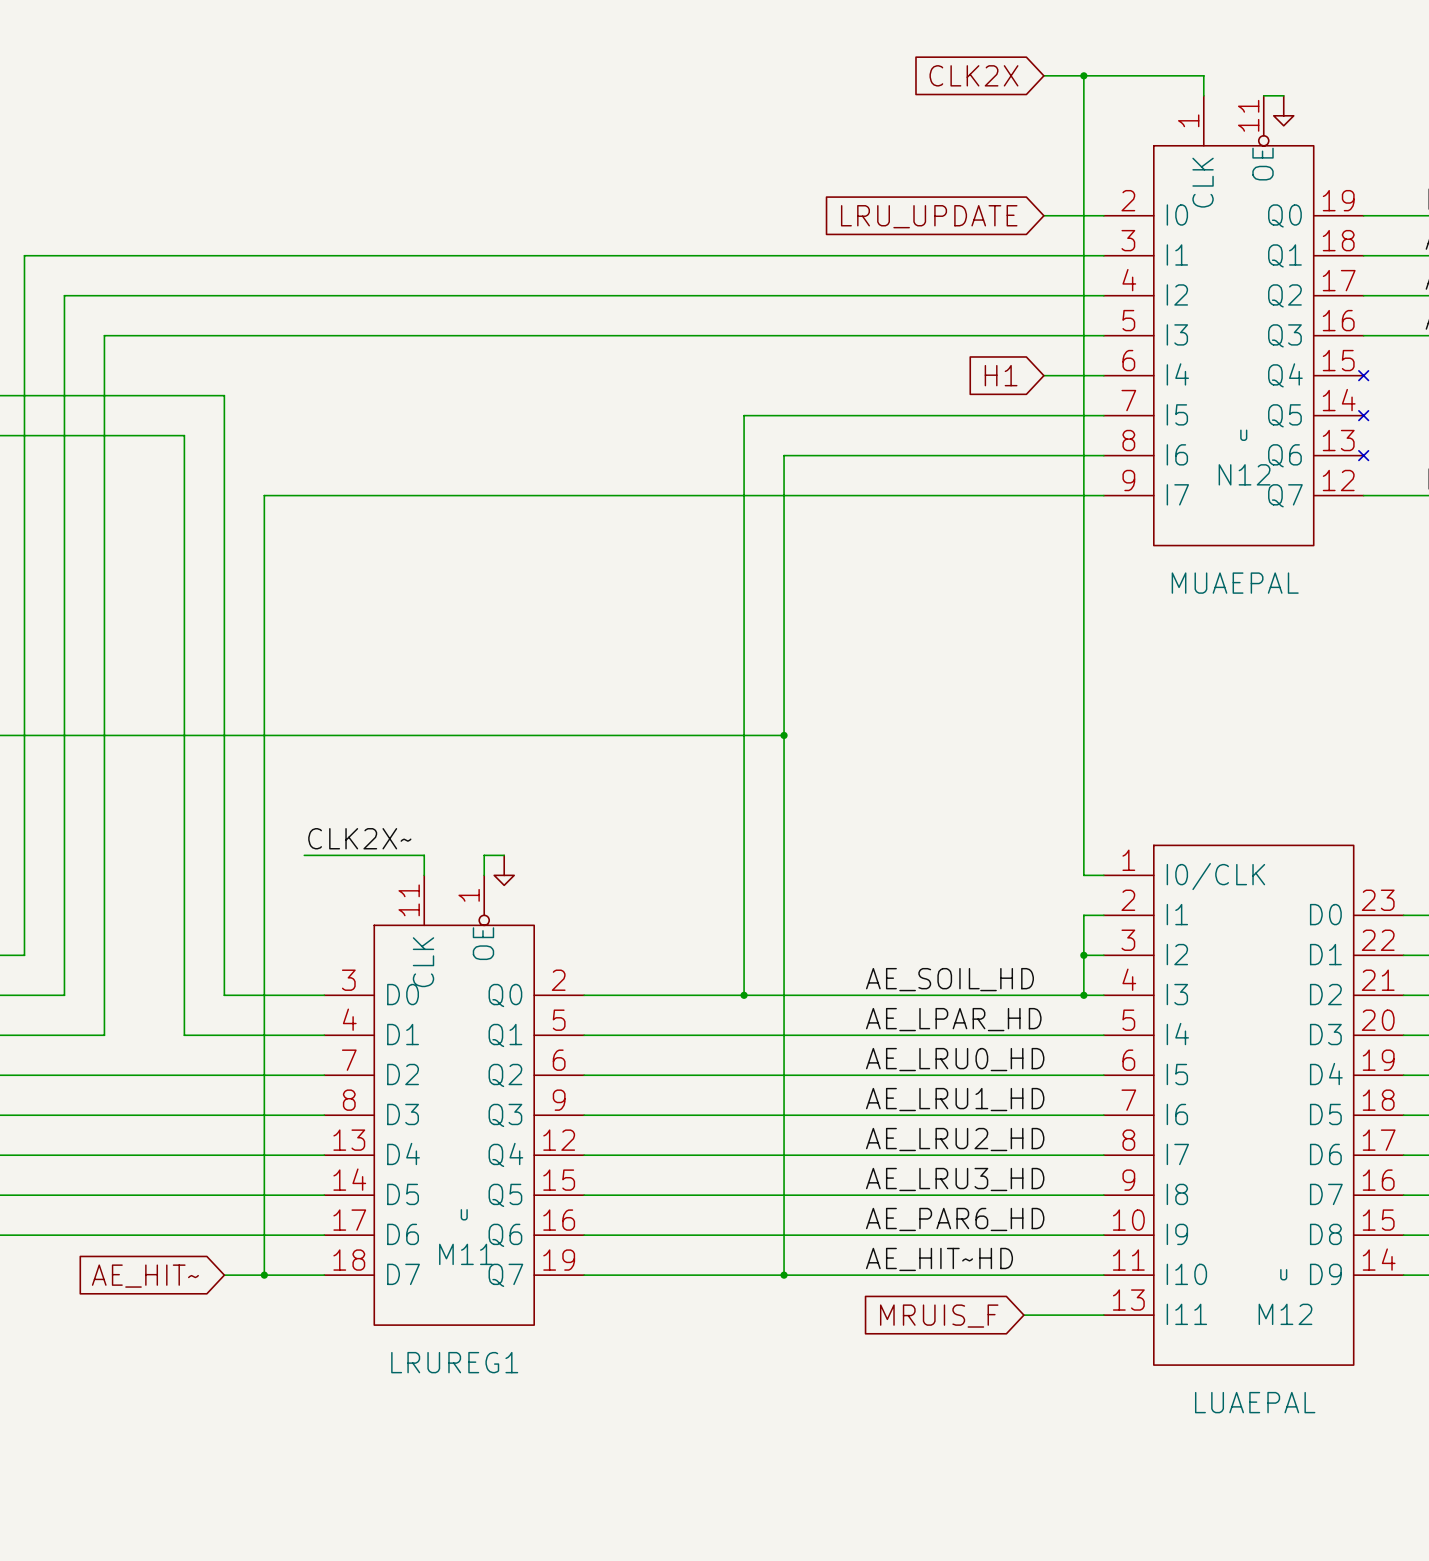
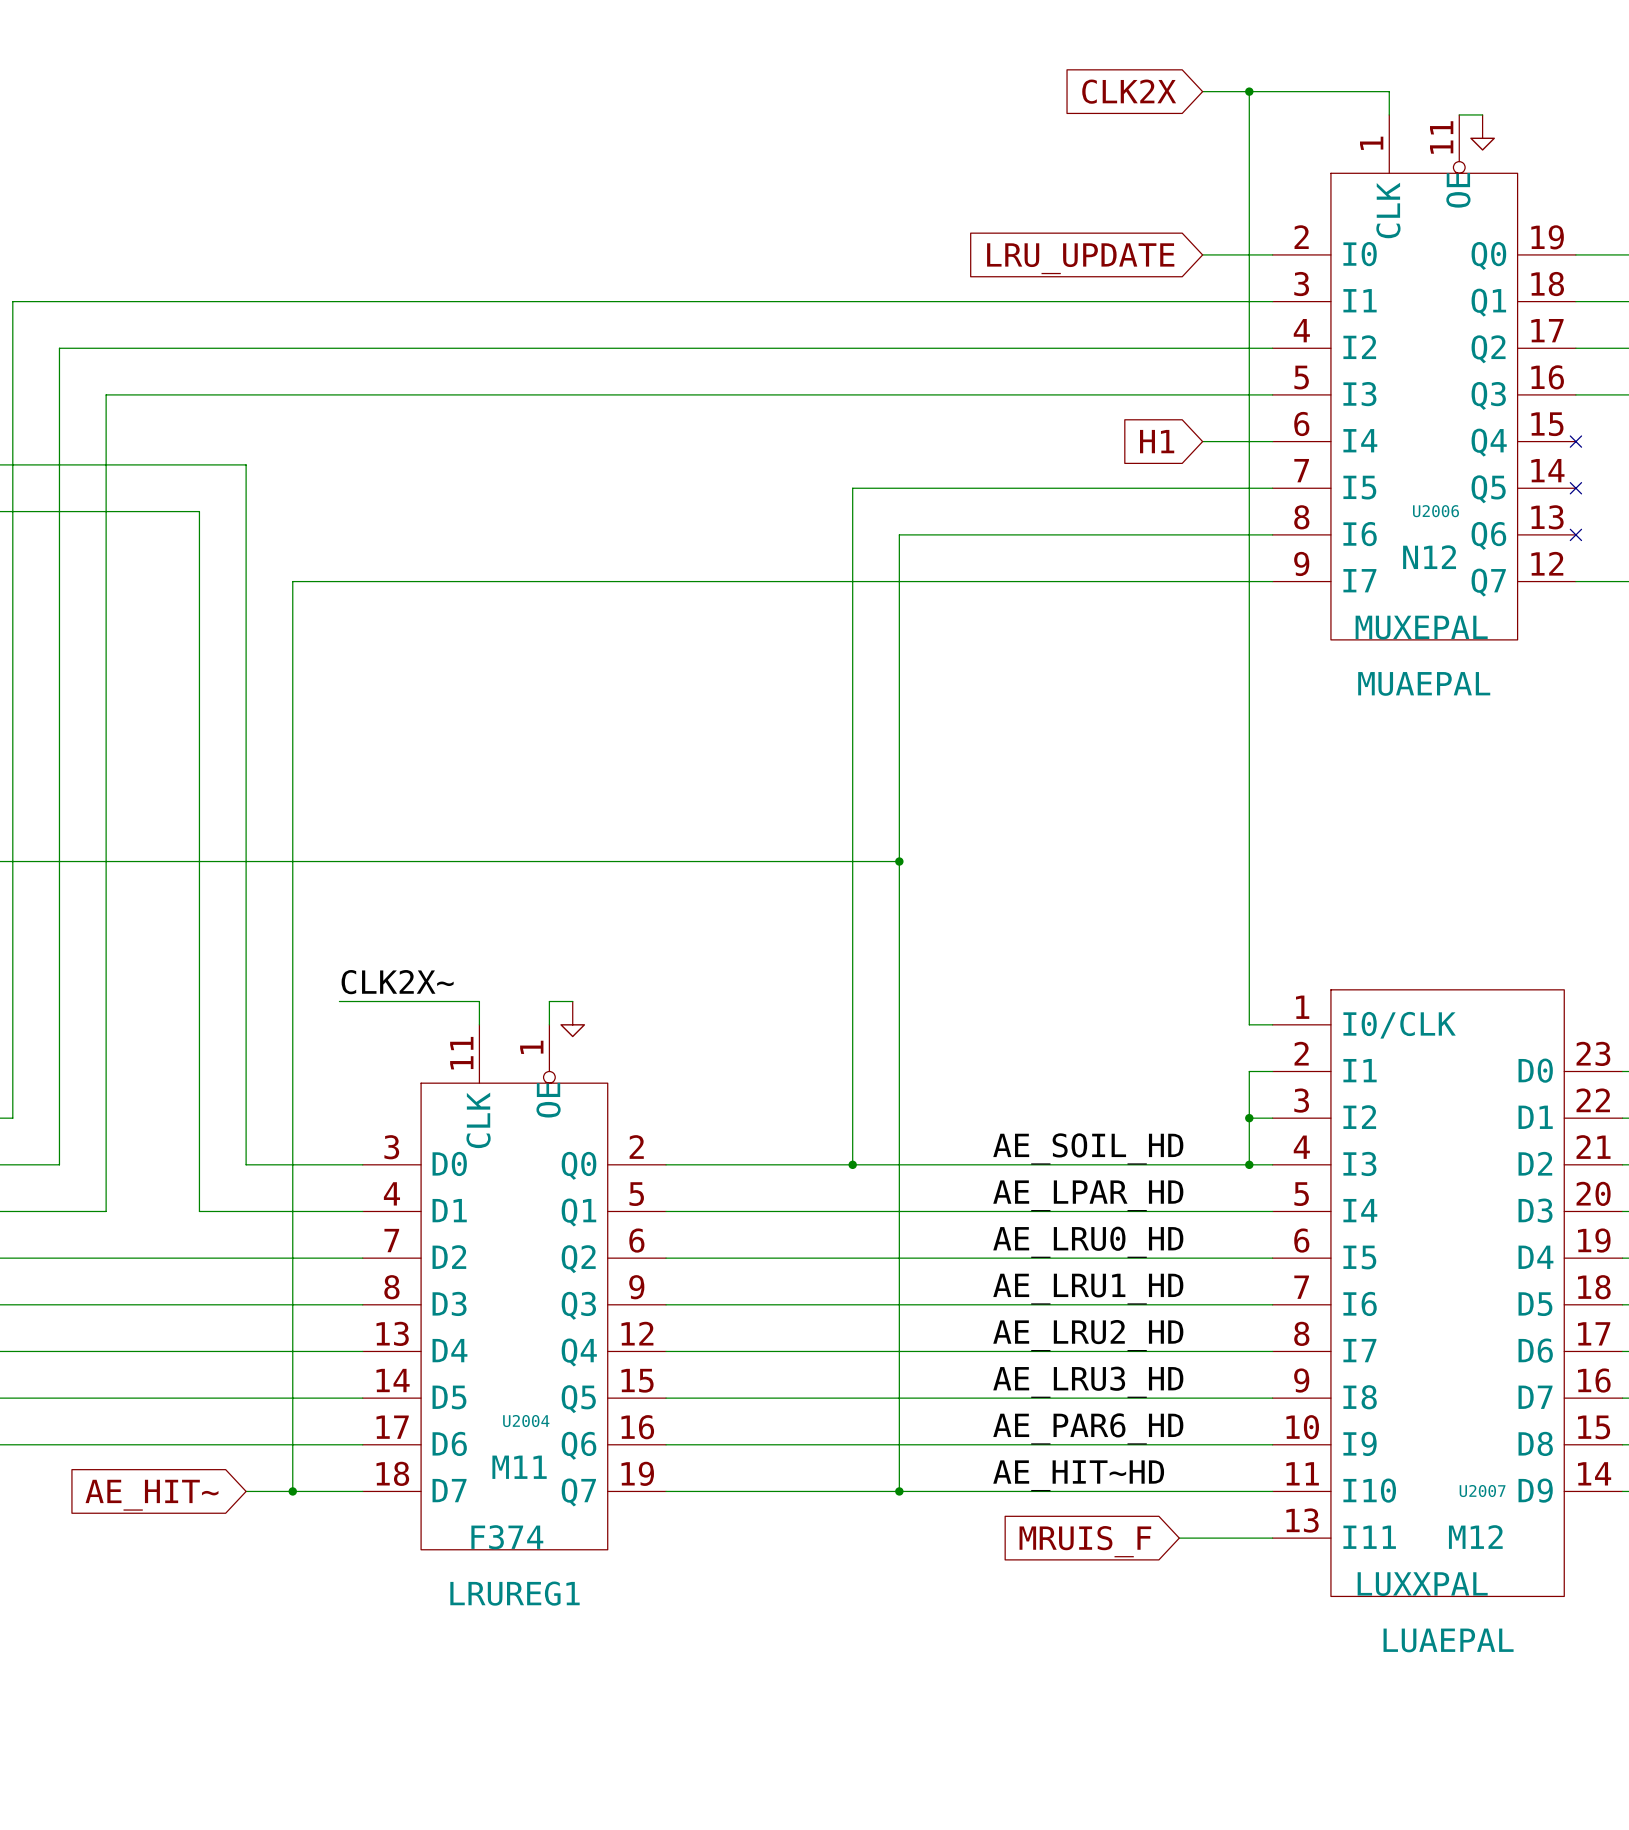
U name: U (1243, 435) -> U2006 (1435, 511)
U value: none -> MUXEPAL (1421, 627)
U name: U (464, 1214) -> U2004 (526, 1421)
U name: U (1283, 1274) -> U2007 (1482, 1491)
U value: none -> F374 (507, 1537)
U value: none -> LUXXPAL (1422, 1584)

